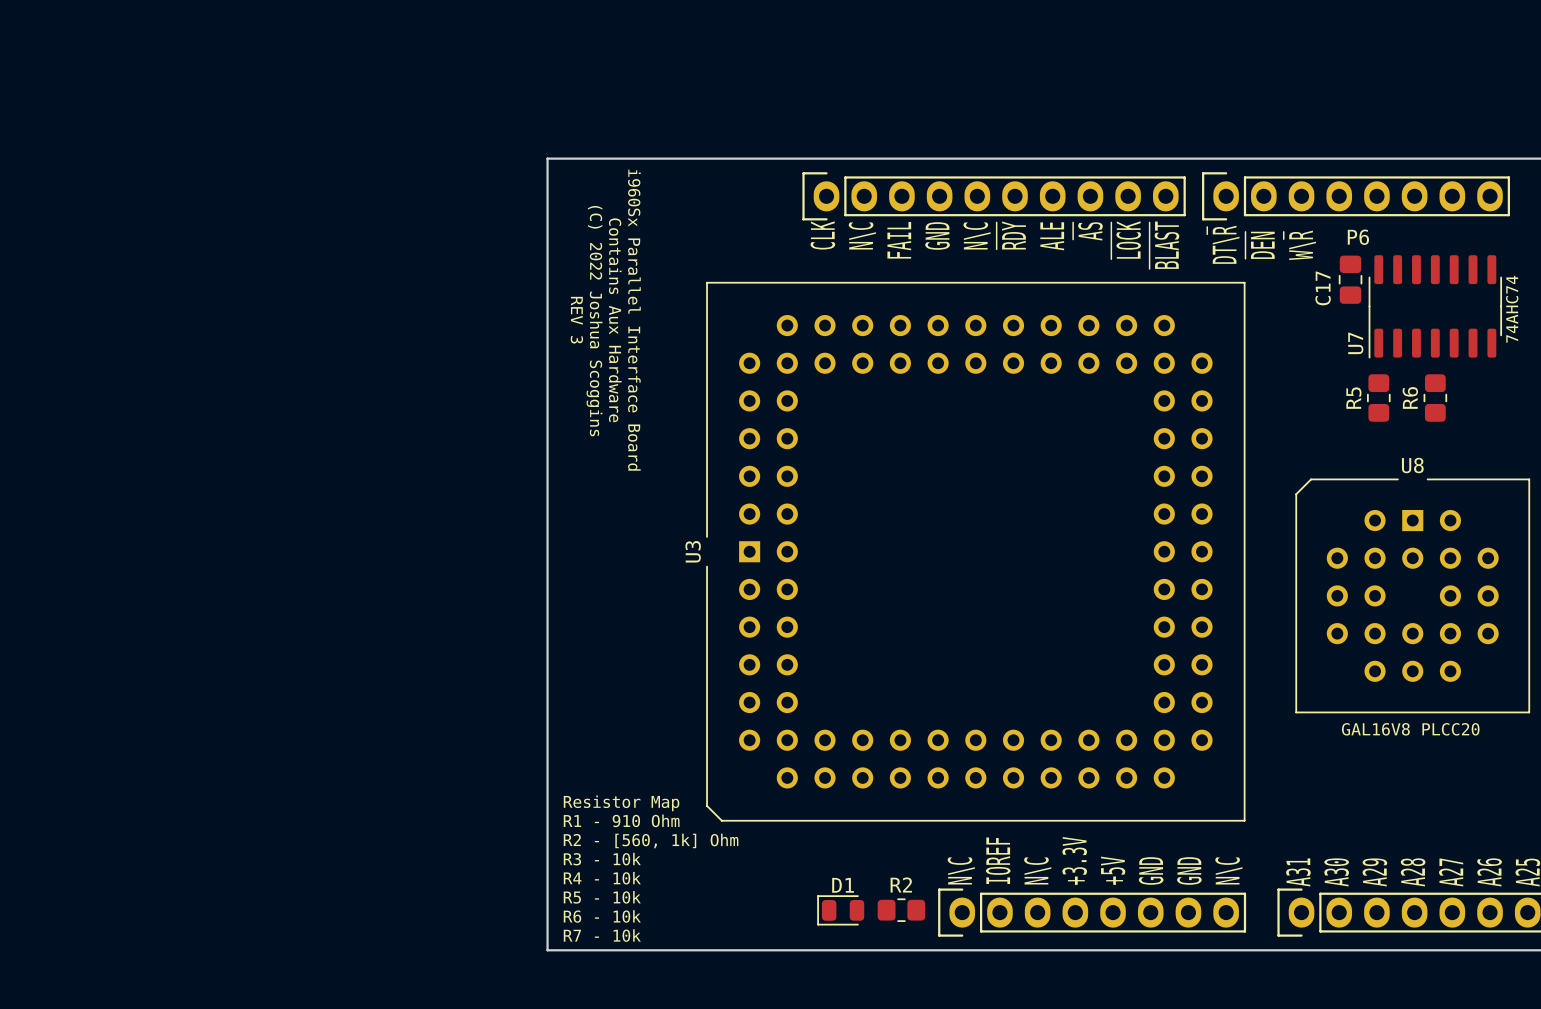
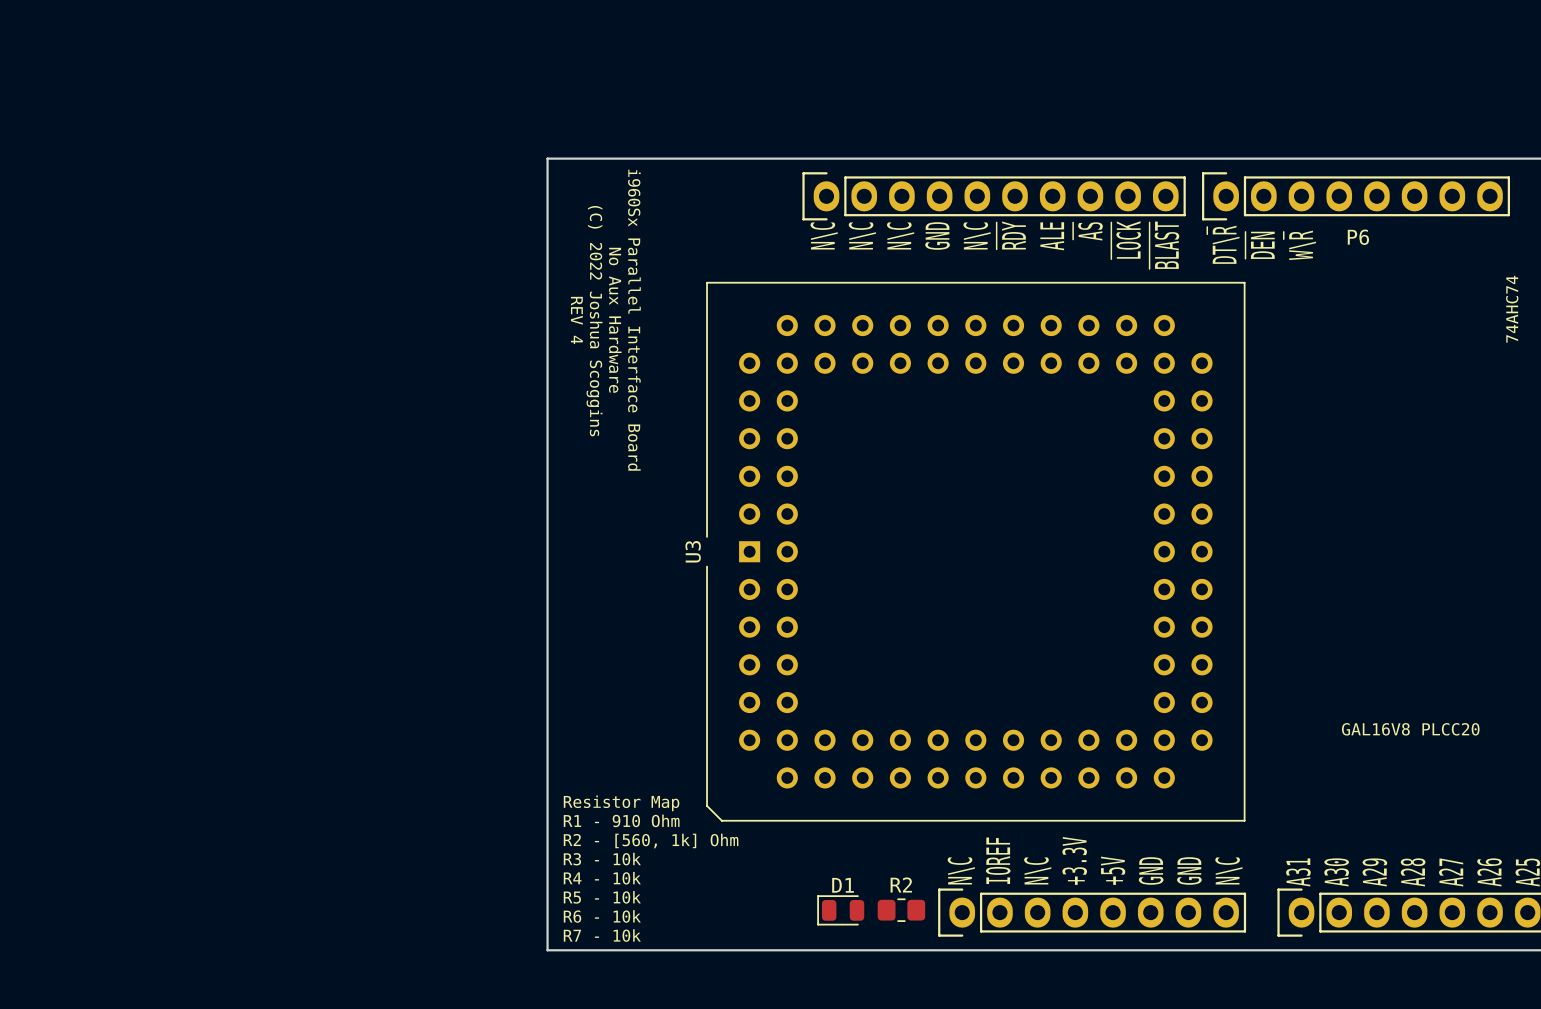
text: CLK (822, 235) -> N\C (824, 235)
text: FAIL (899, 240) -> N\C (900, 235)
C17: (1350, 279) -> none
U7: (1435, 306) -> none
text: REV 3 (576, 320) -> REV 4 (576, 320)
text: Contains Aux Hardware (615, 320) -> No Aux Hardware (615, 320)
R5: (1378, 398) -> none
R6: (1435, 398) -> none
U8: (1412, 595) -> none

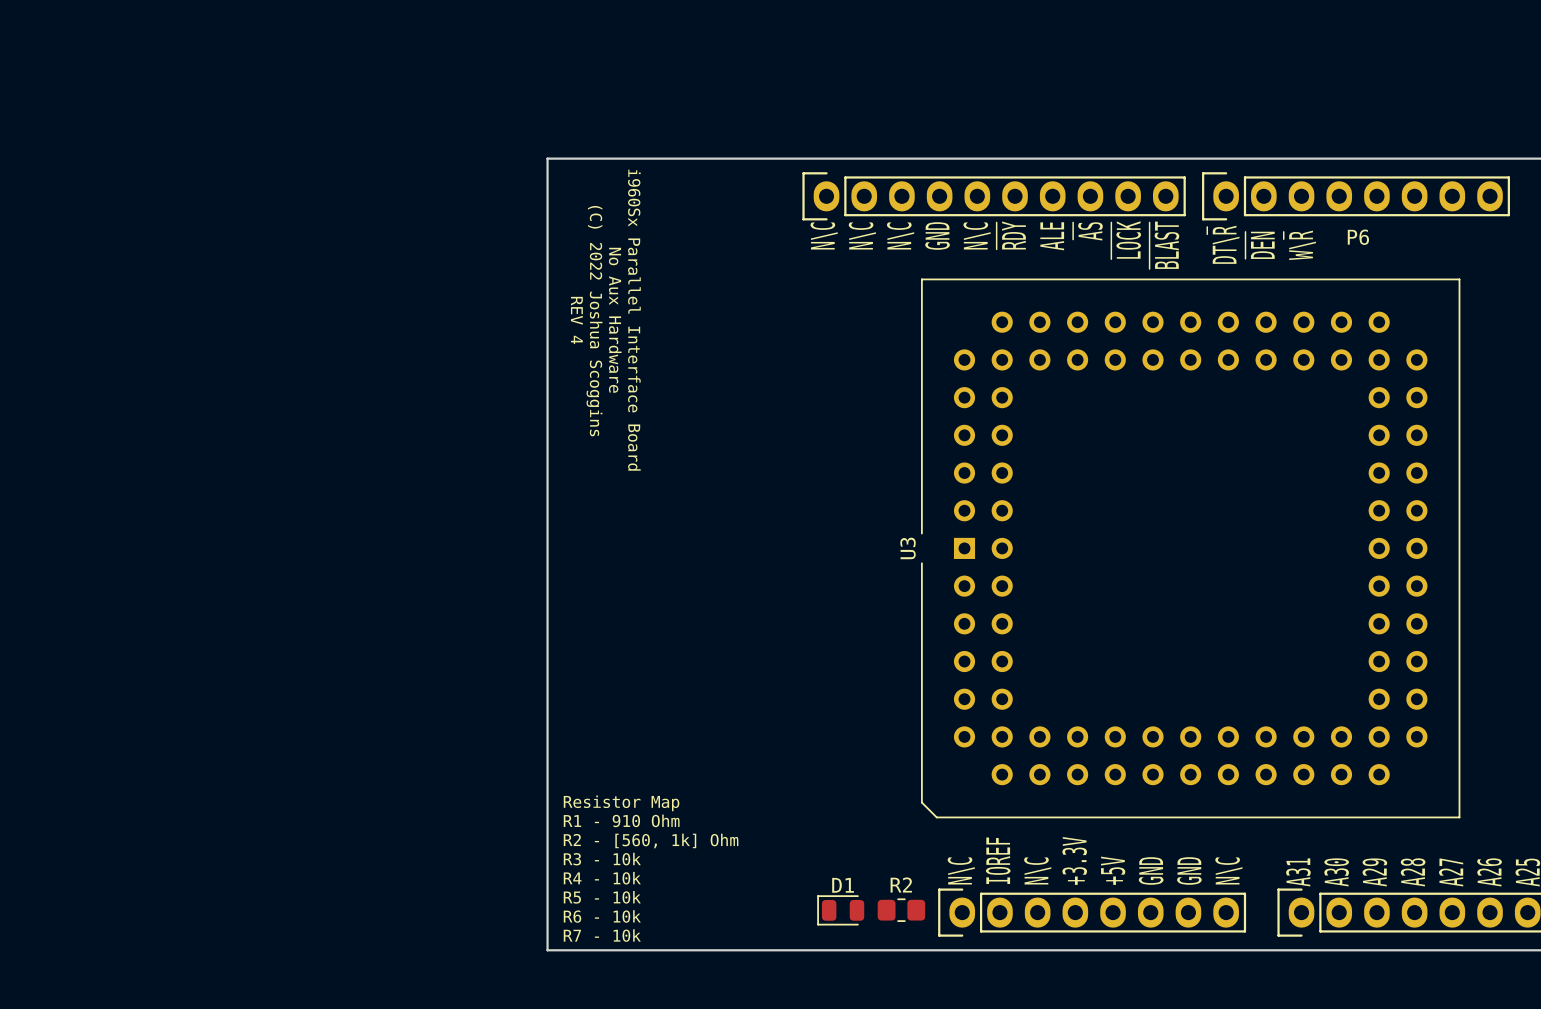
text: 74AHC74 (1512, 309) -> none
U3 position: (975, 551) -> (1190, 548)
text: GAL16V8 PLCC20 (1410, 729) -> none

